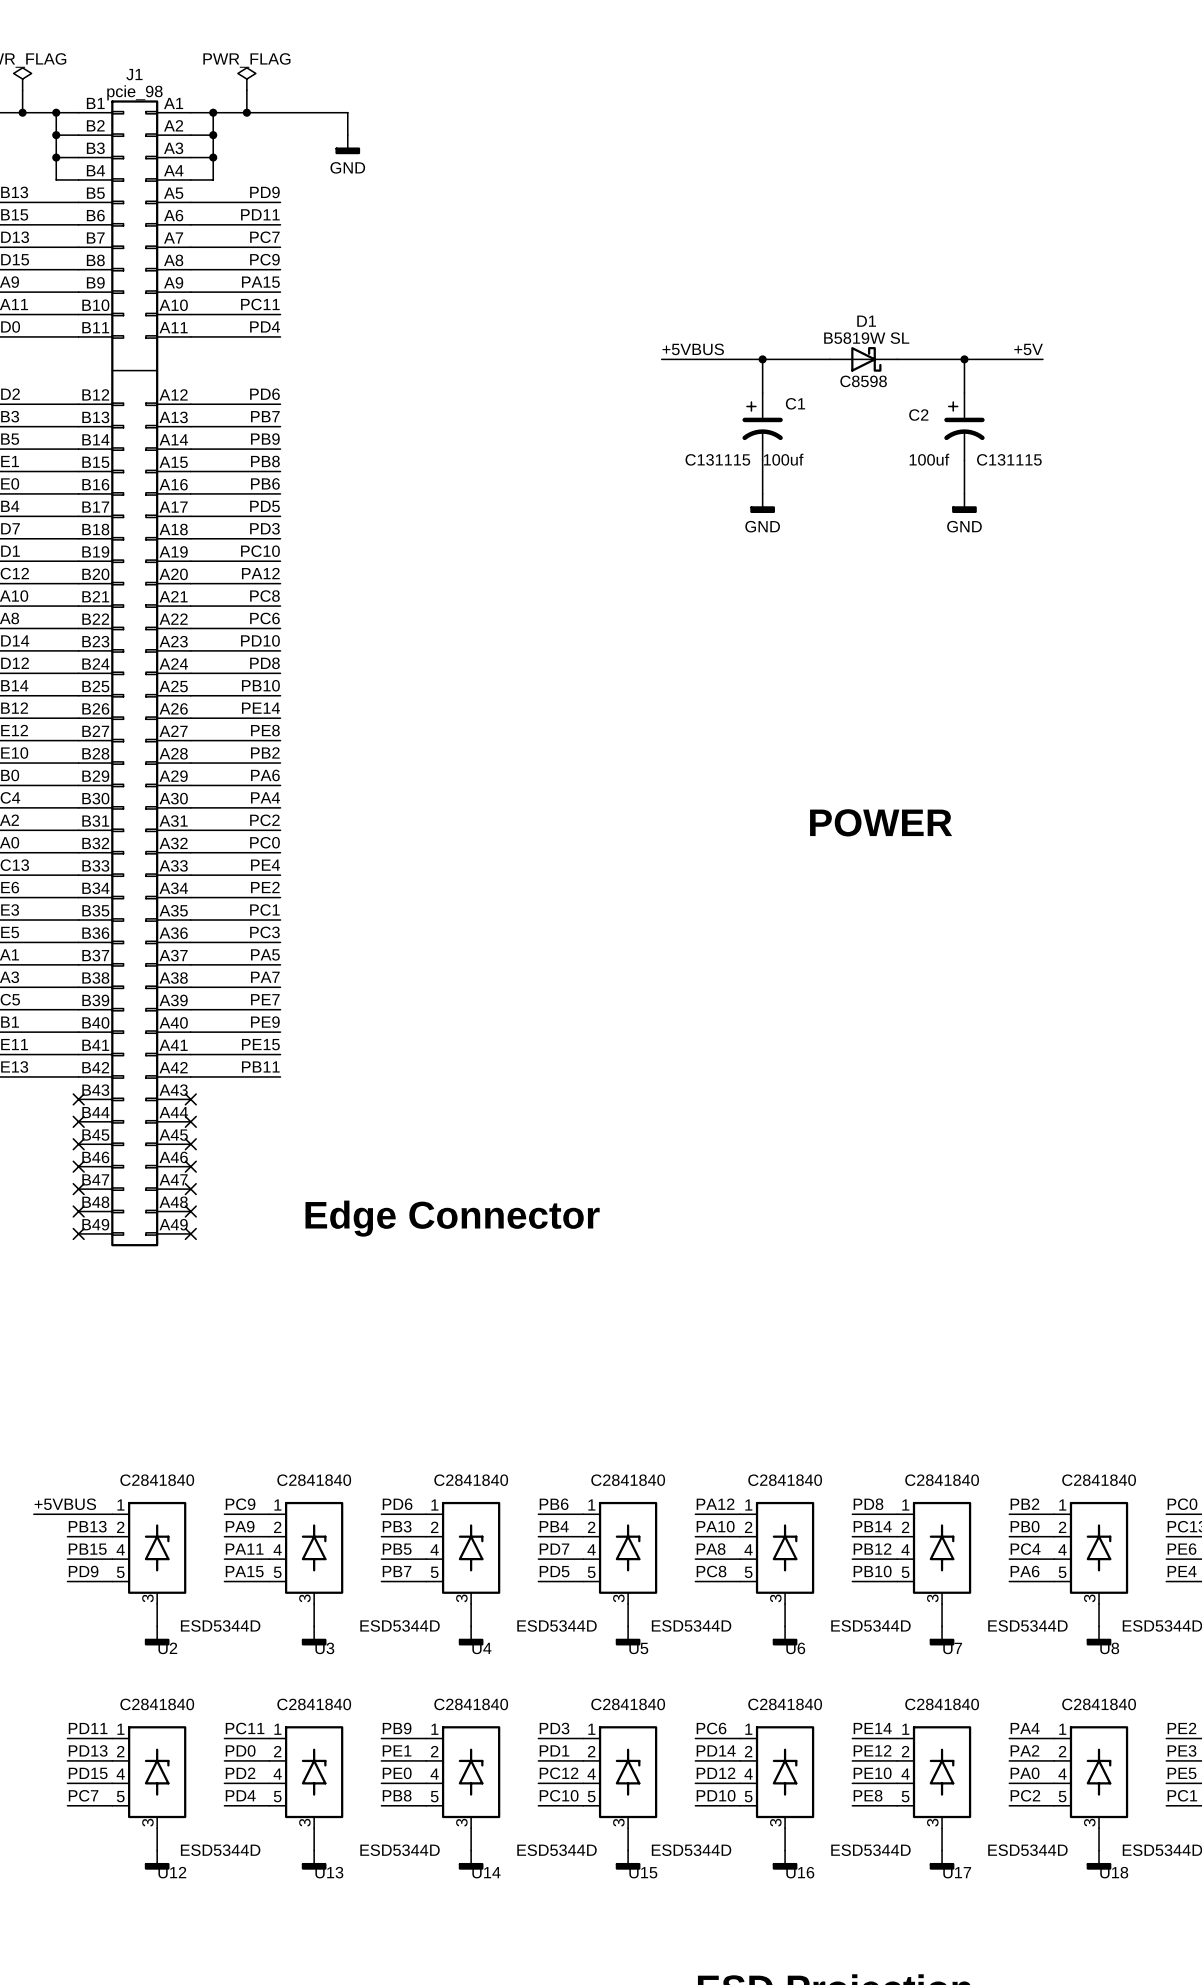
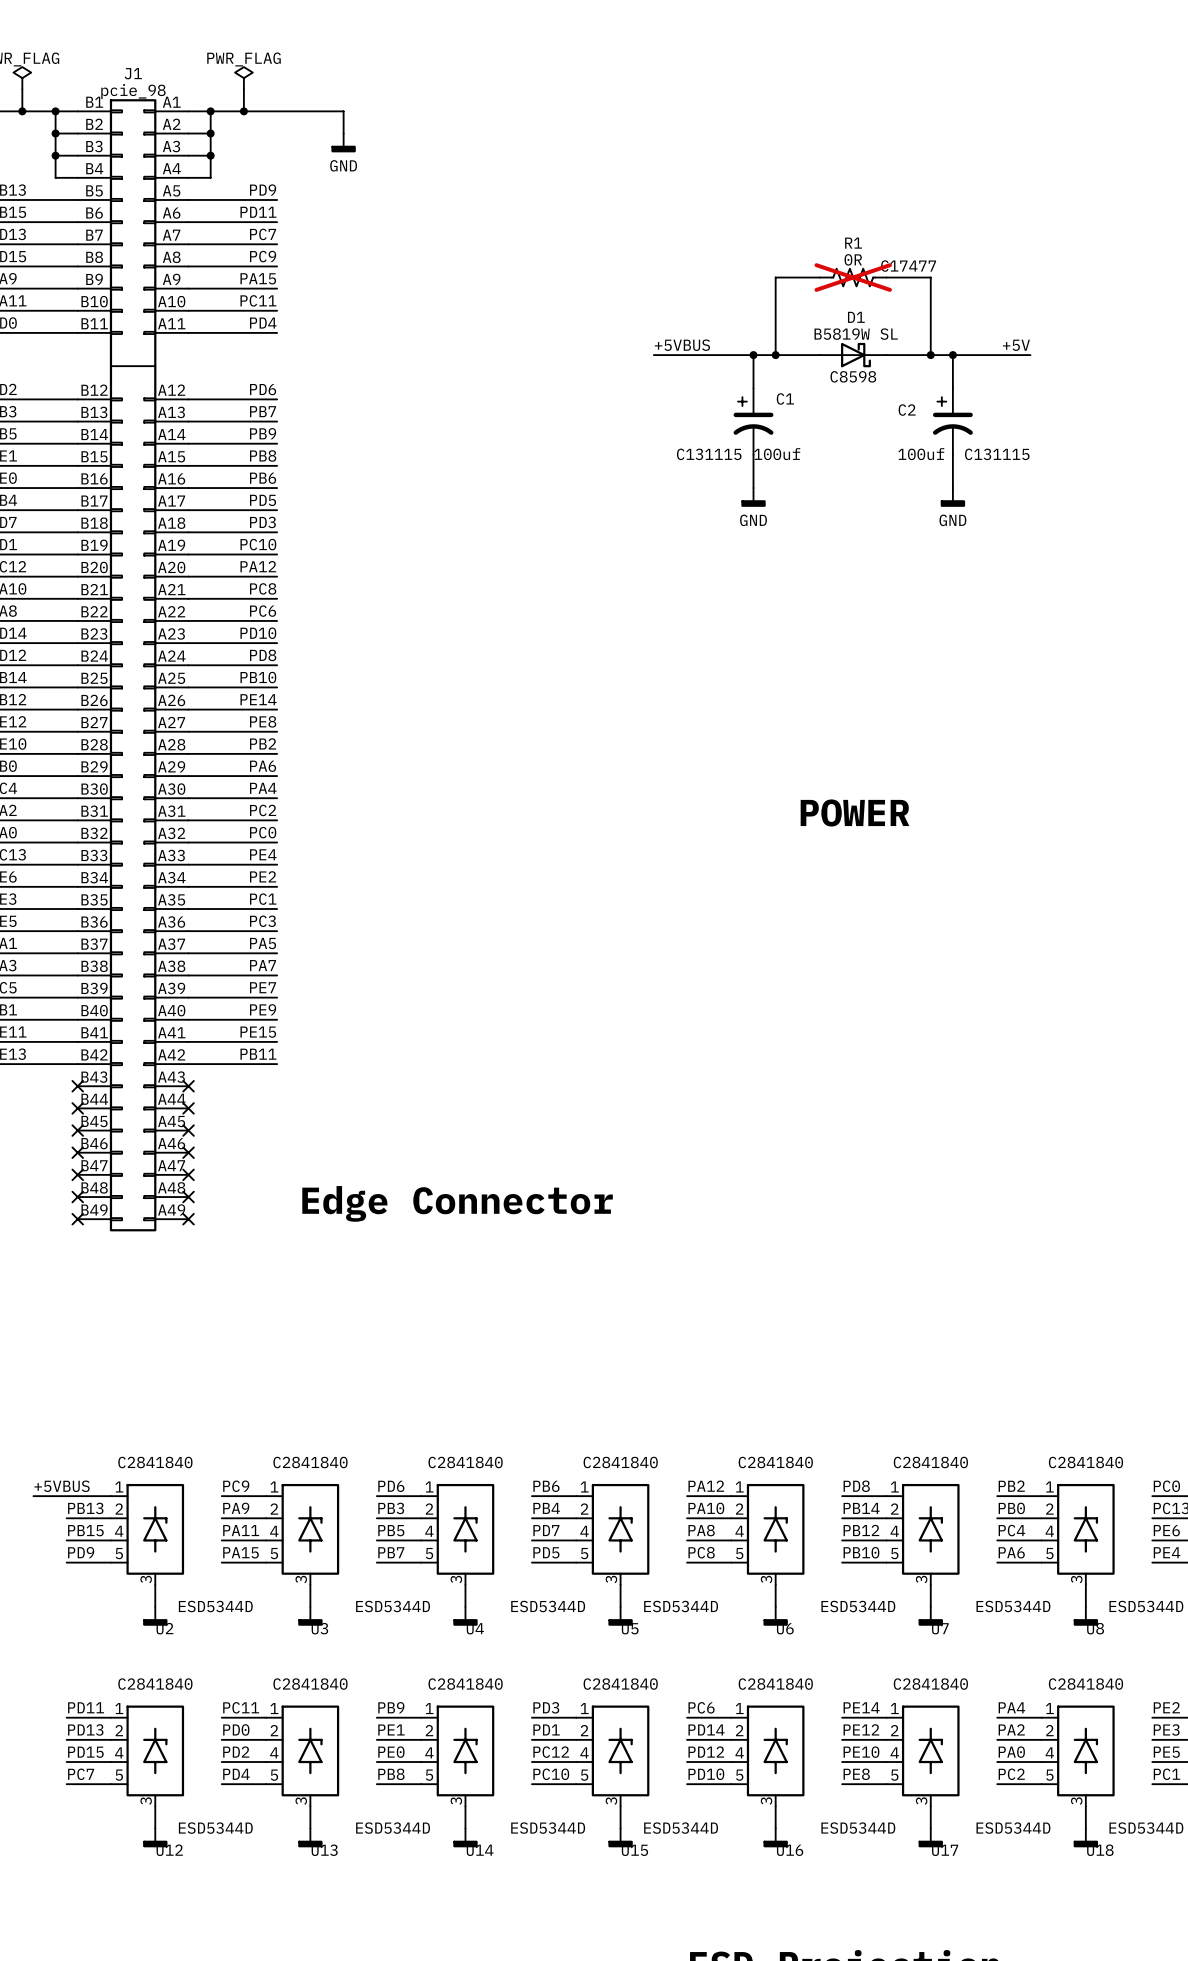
wire: none -> (819, 277) (775, 277) (775, 355)
R1: none -> 0R (853, 277)
wire: none -> (886, 277) (930, 277) (930, 355)
junction: none -> (775, 355)
junction: none -> (930, 355)

